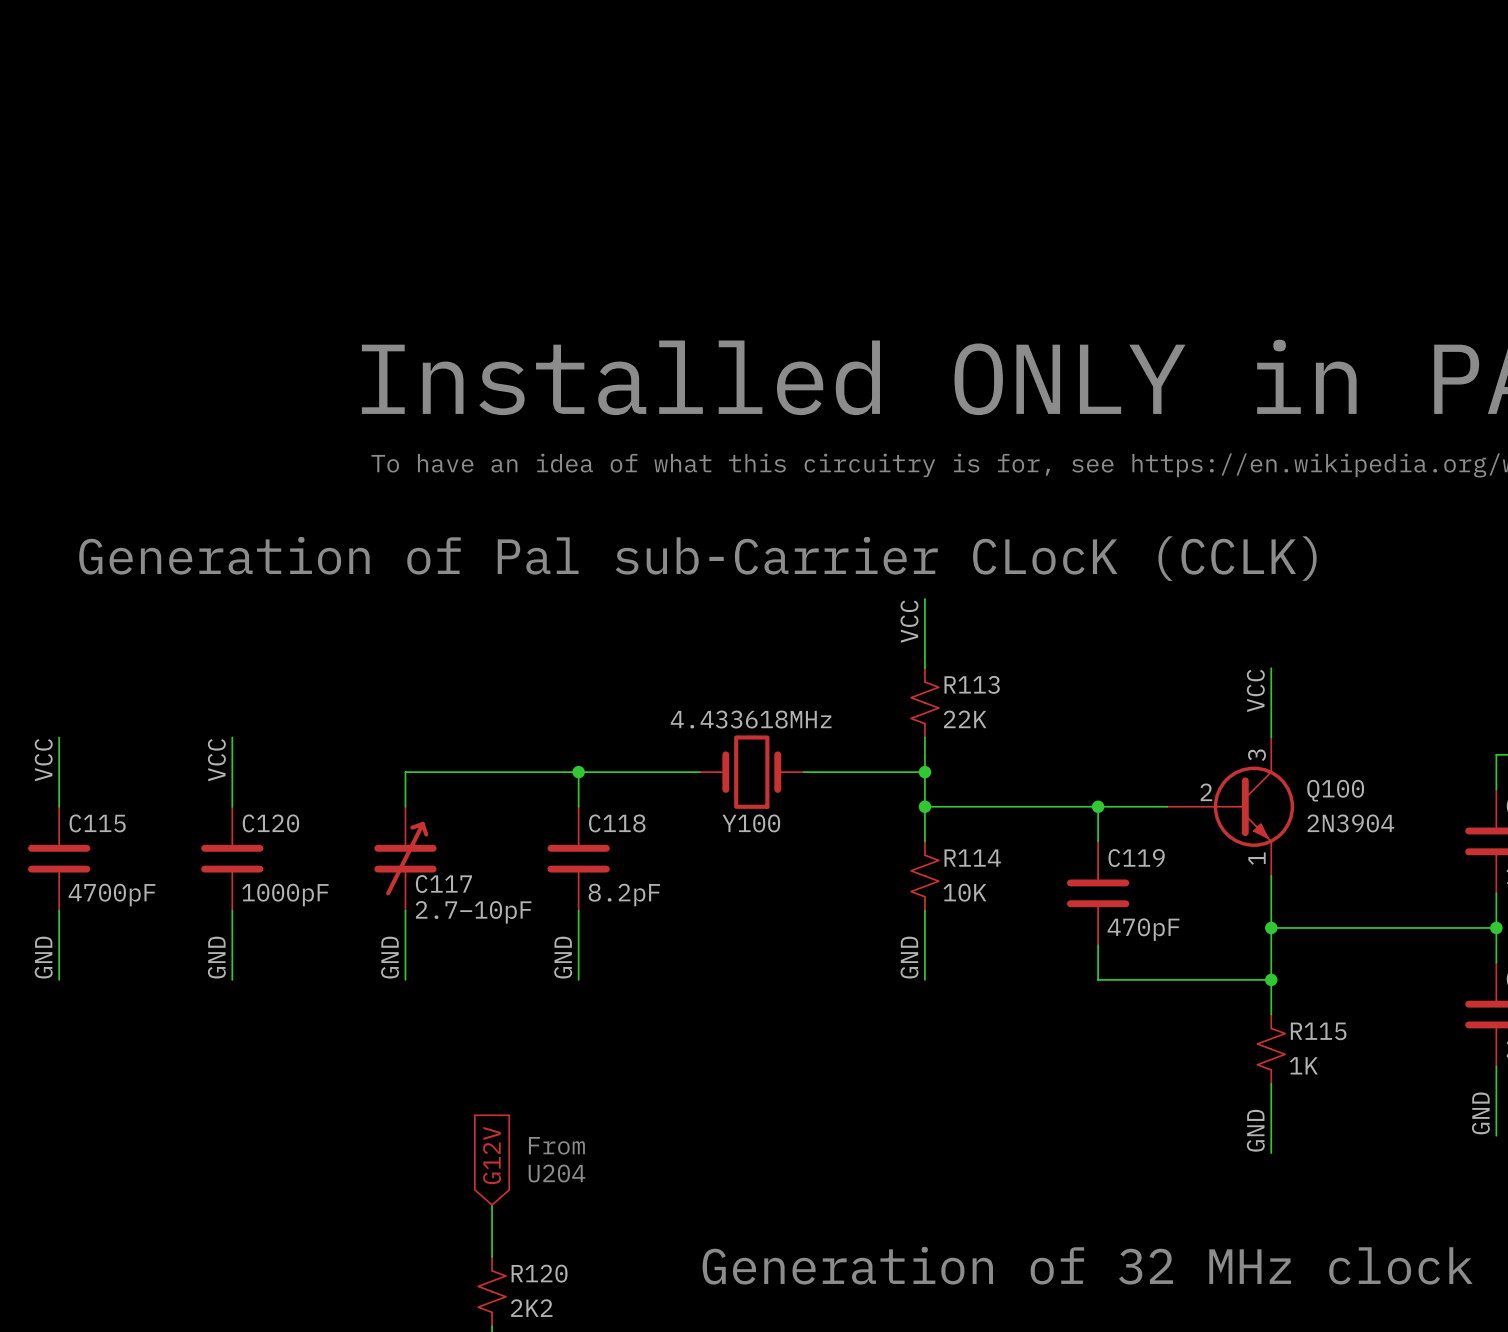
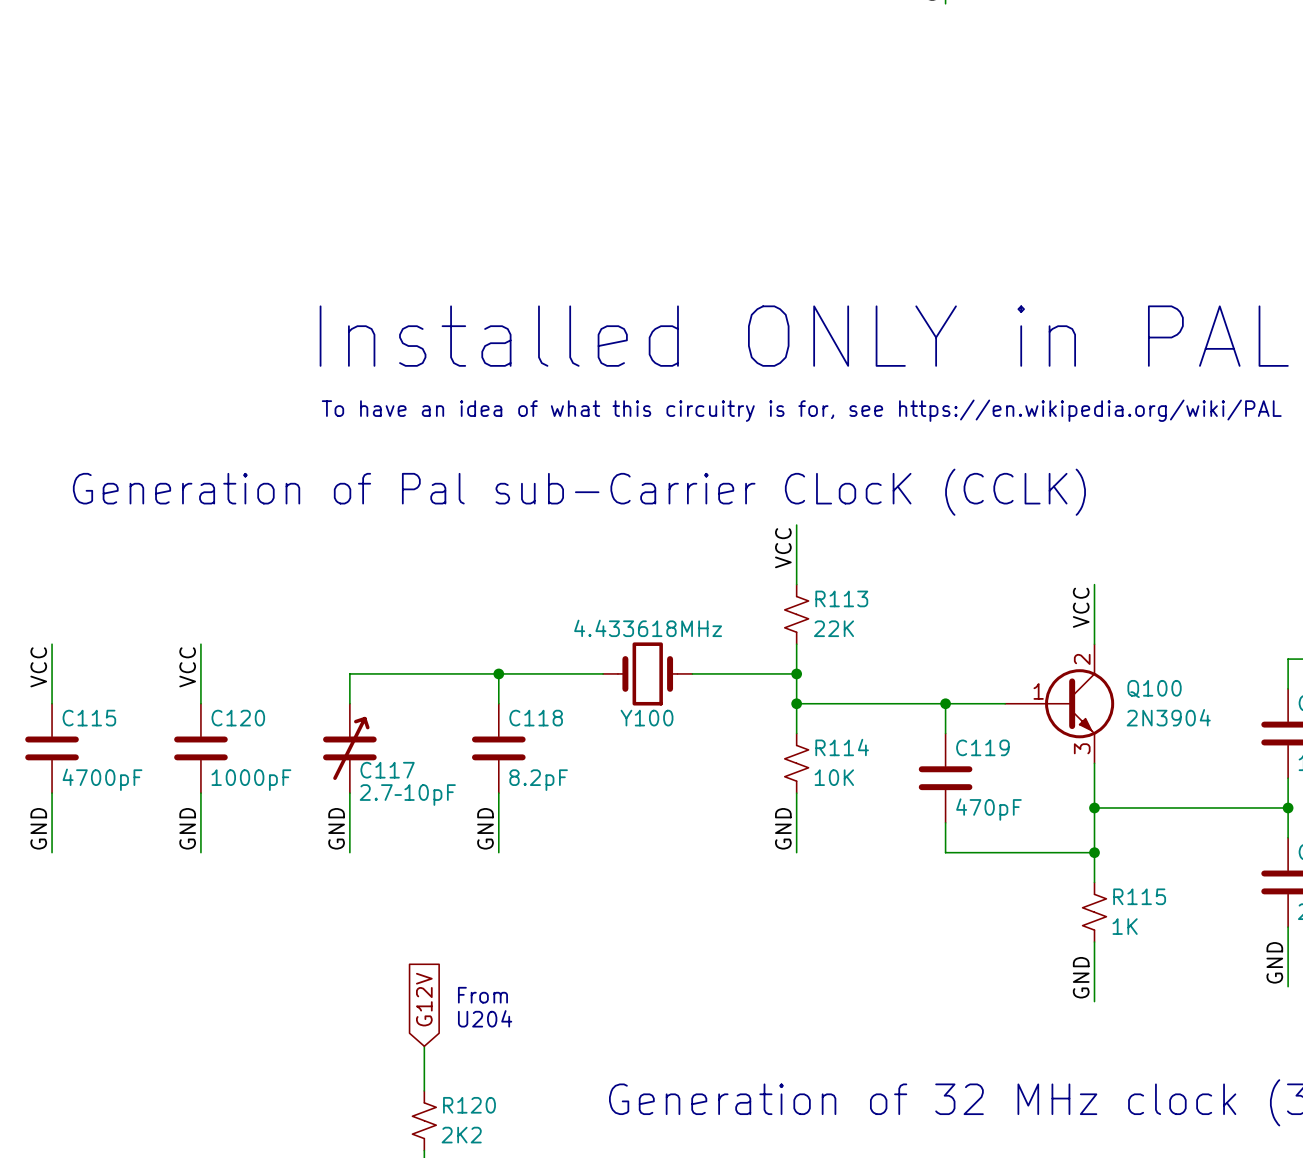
Q100 pin number: 3 (1256, 755) -> 2 (1082, 659)
Q100 pin number: 2 (1206, 792) -> 1 (1038, 691)
Q100 pin number: 1 (1256, 858) -> 3 (1082, 748)

